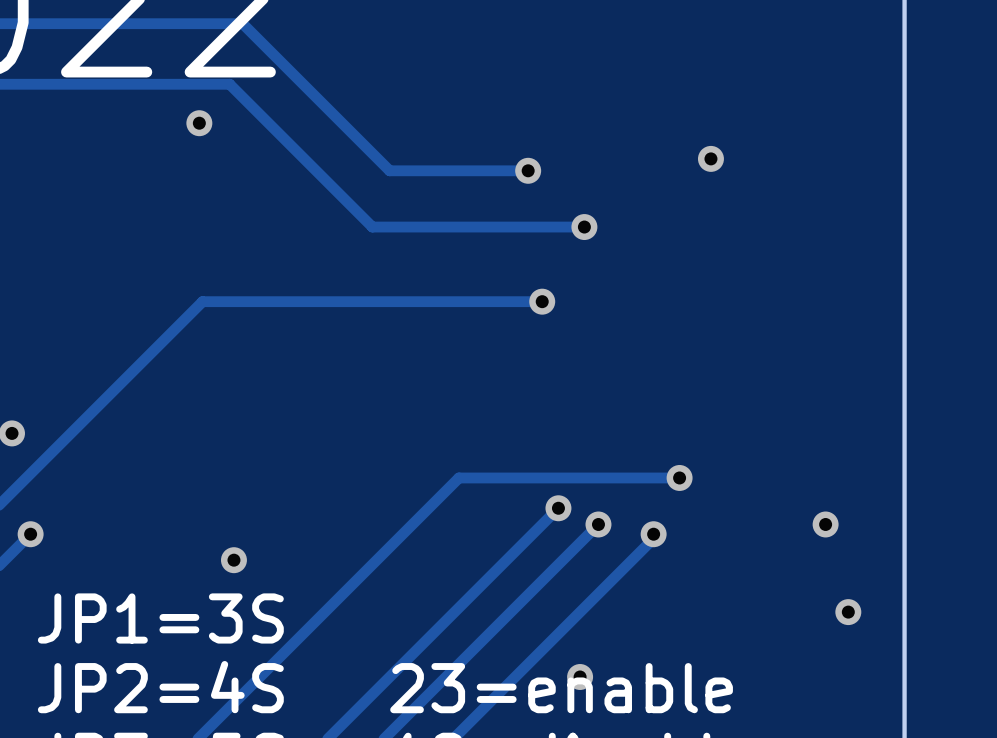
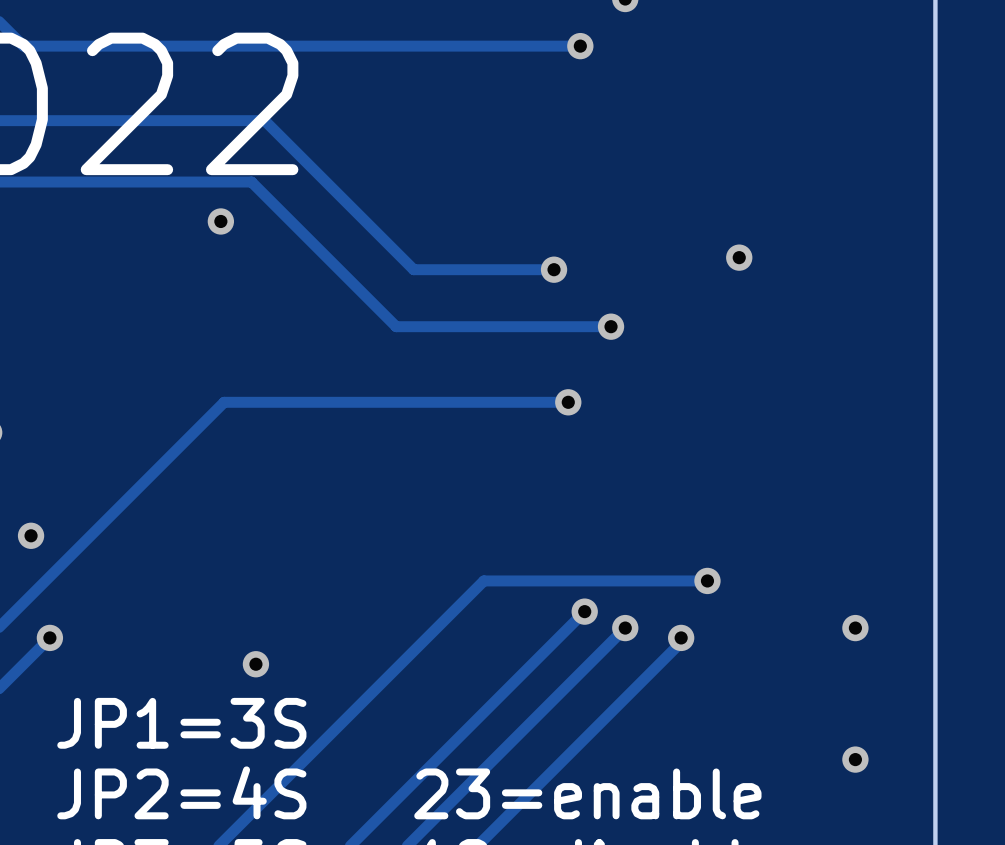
via position: (848, 612) -> (855, 759)
via: (580, 676) -> none

